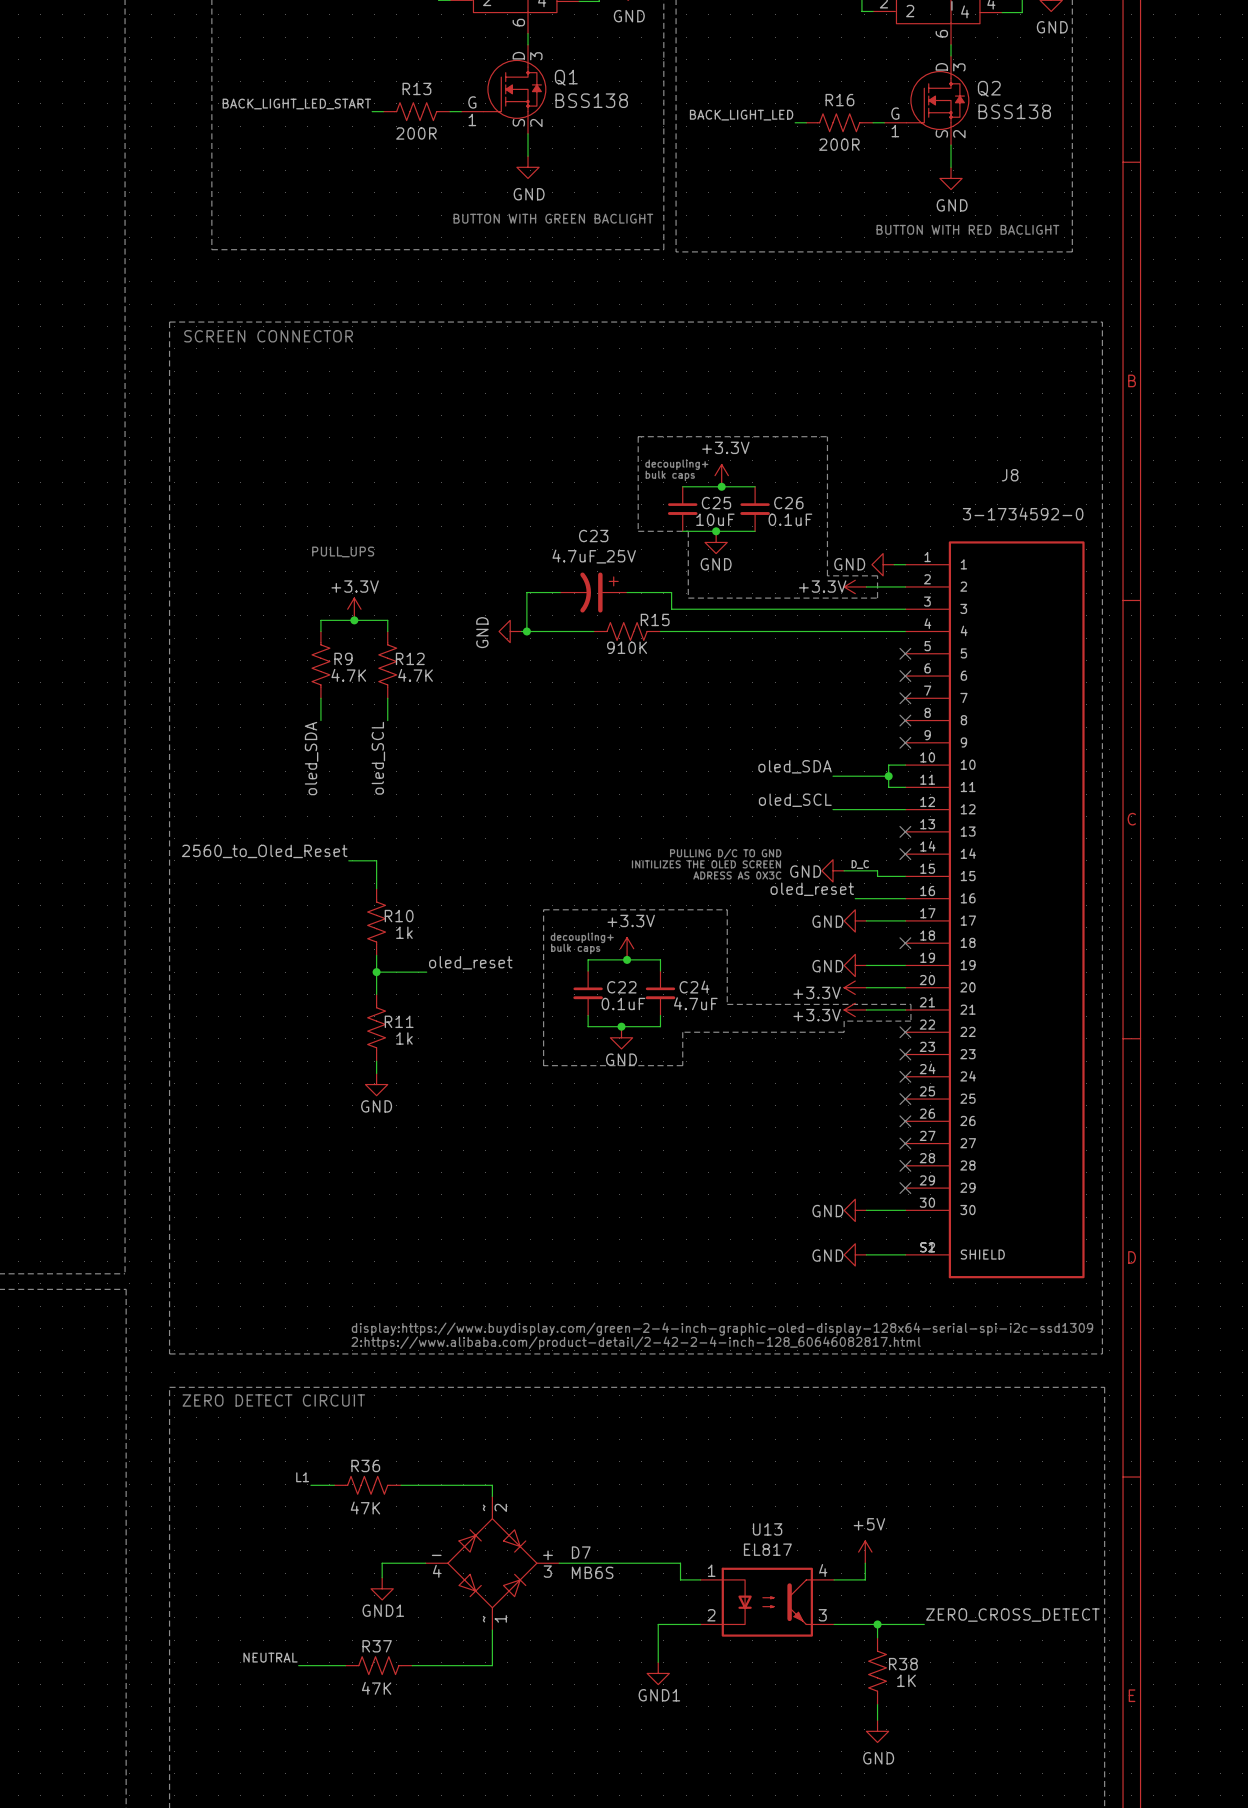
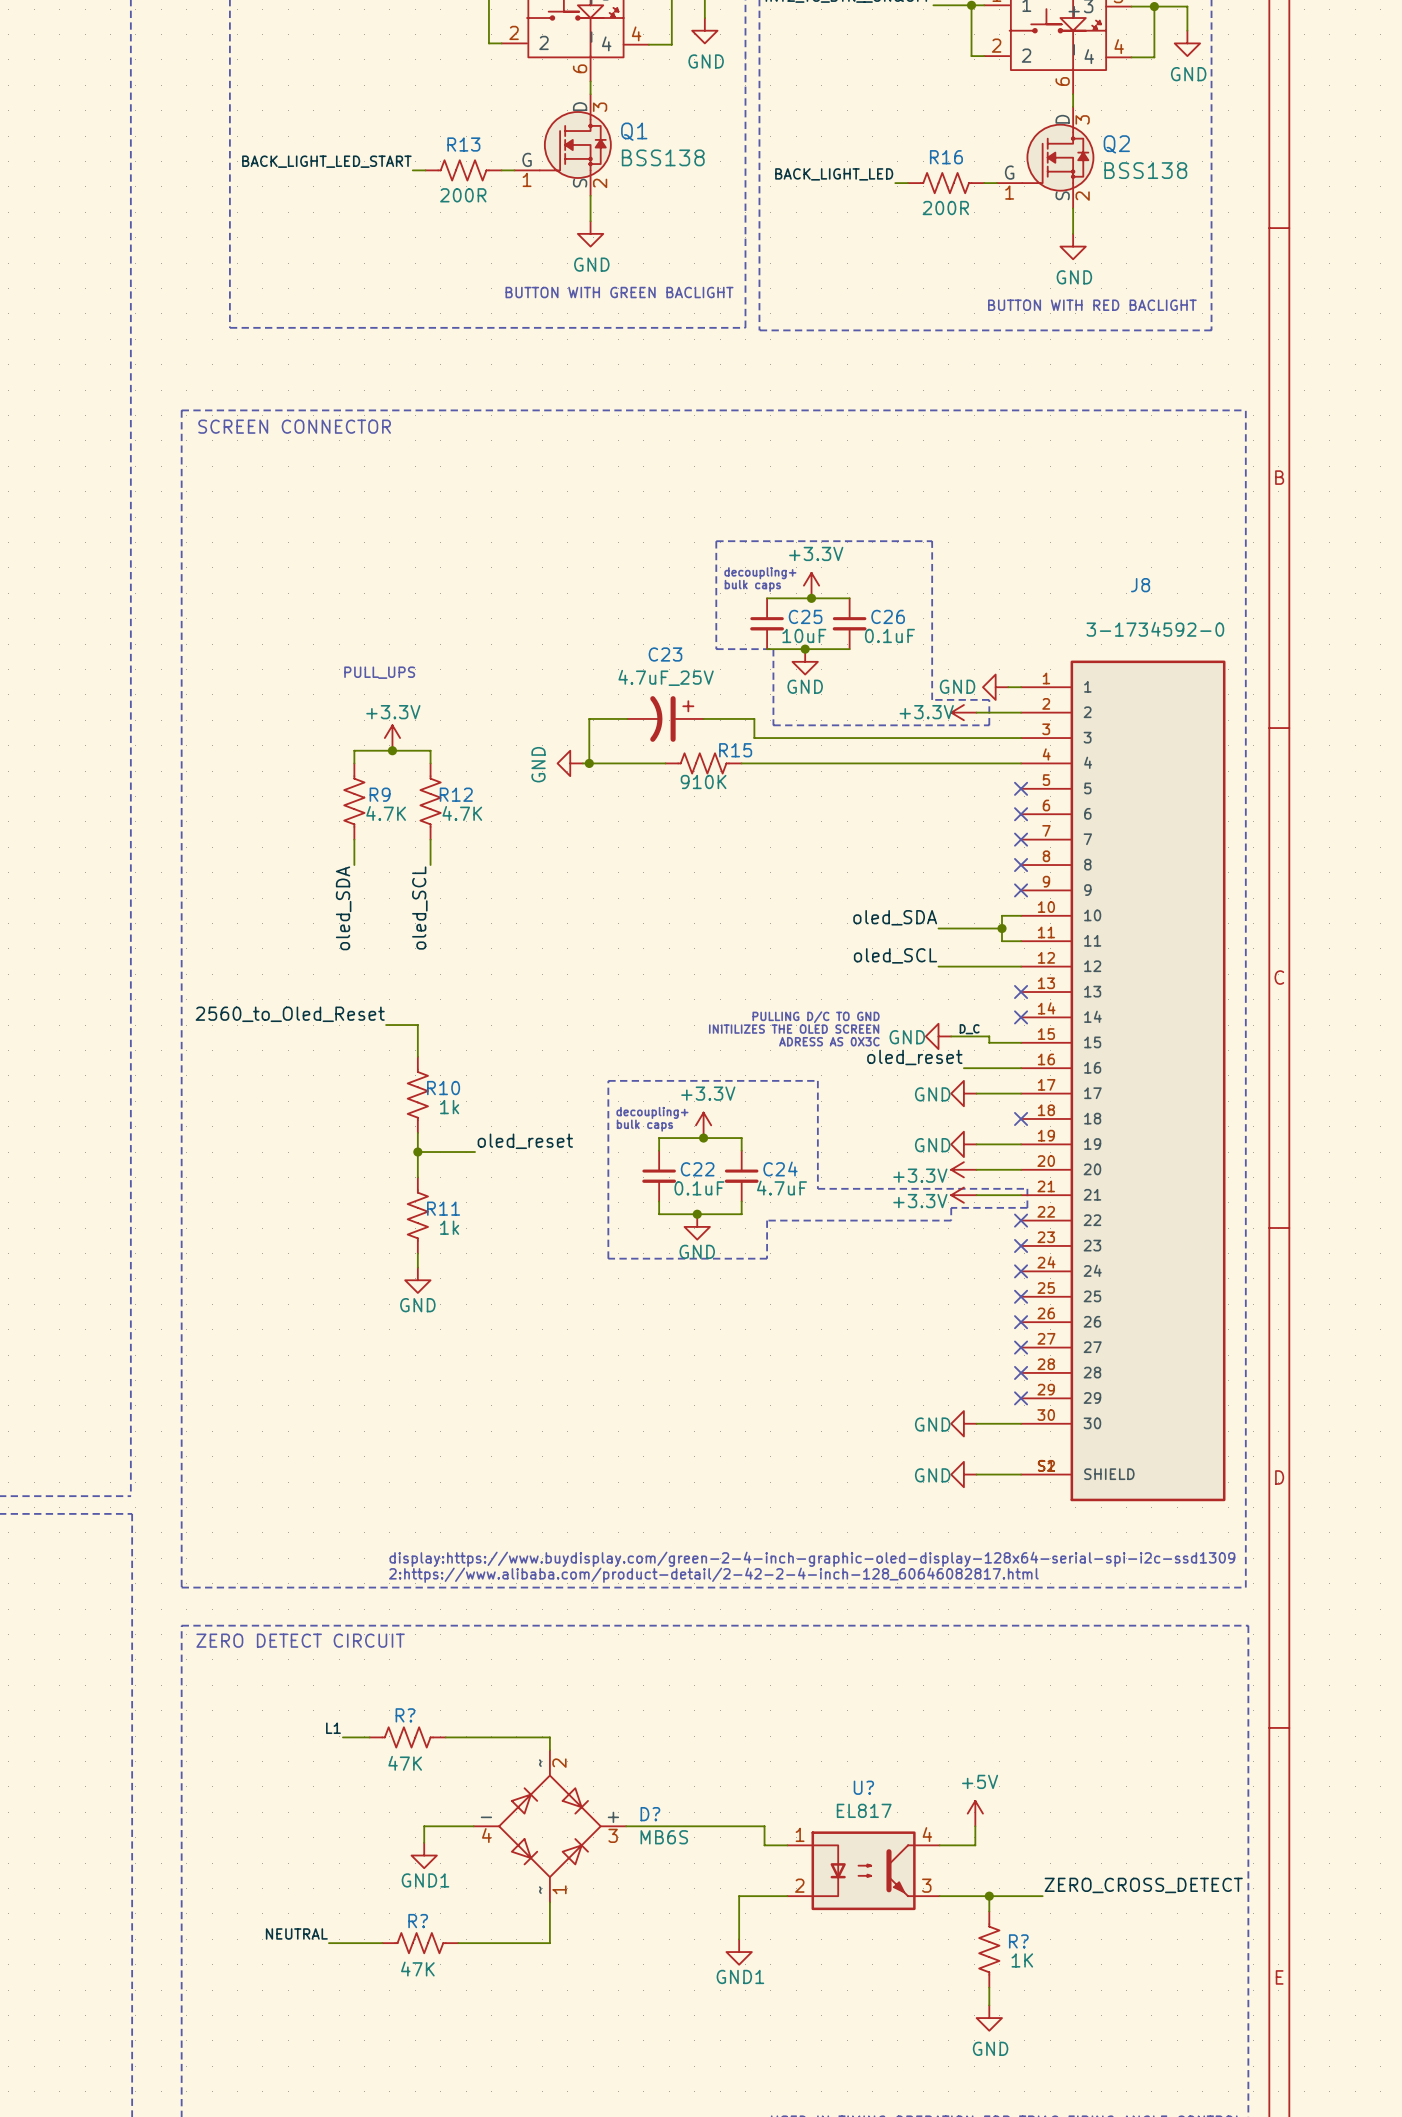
R36 name: R36 (365, 1465) -> R? (405, 1715)
U13 name: U13 (767, 1529) -> U? (863, 1787)
D7 name: D7 (581, 1552) -> D? (650, 1814)
R37 name: R37 (377, 1646) -> R? (418, 1921)
R38 name: R38 (903, 1664) -> R? (1018, 1941)

